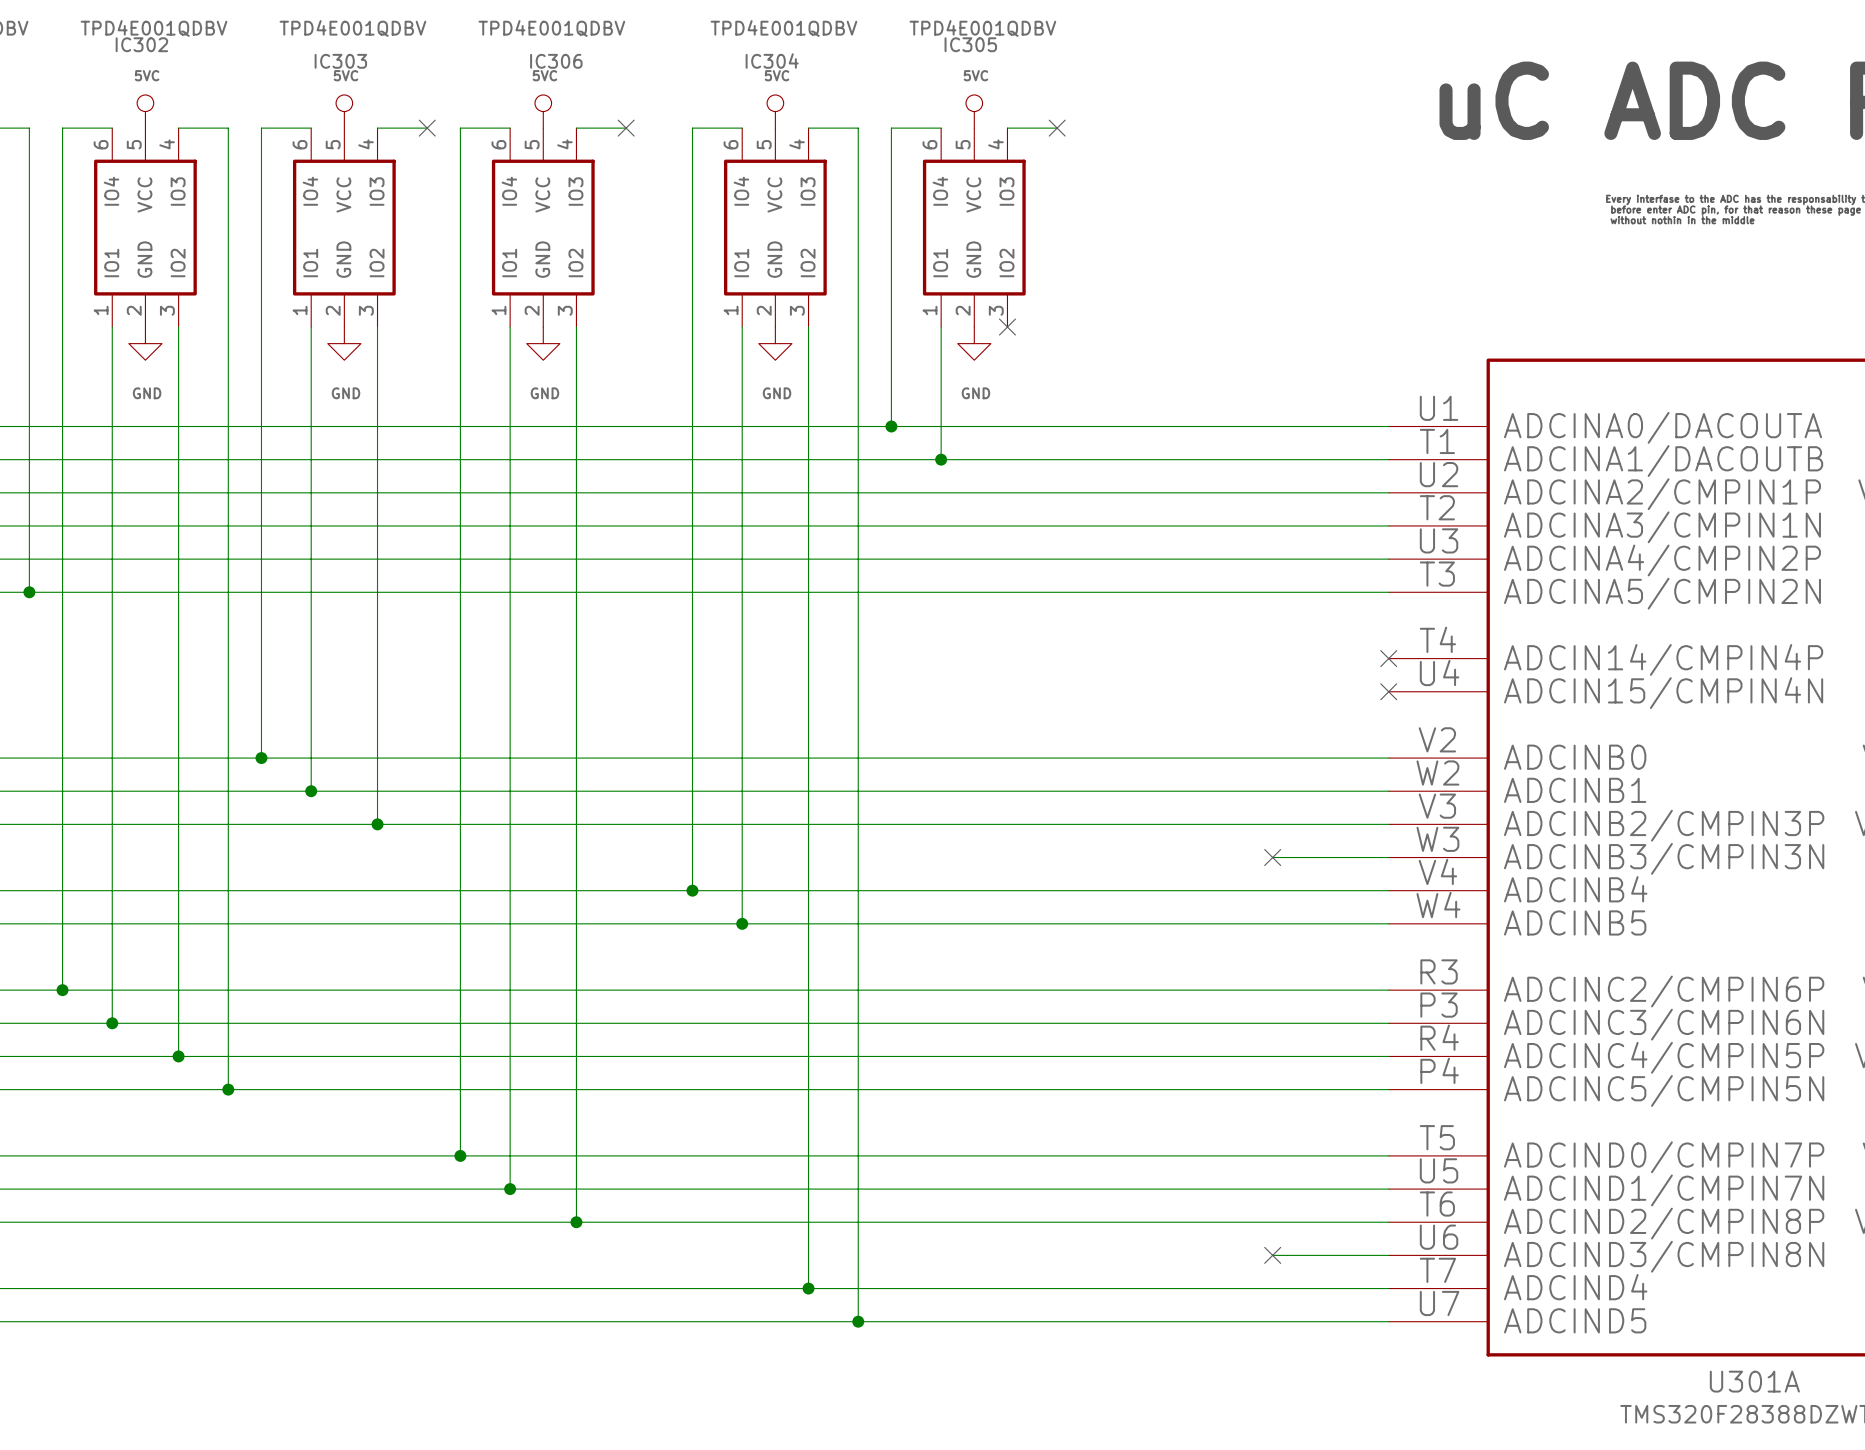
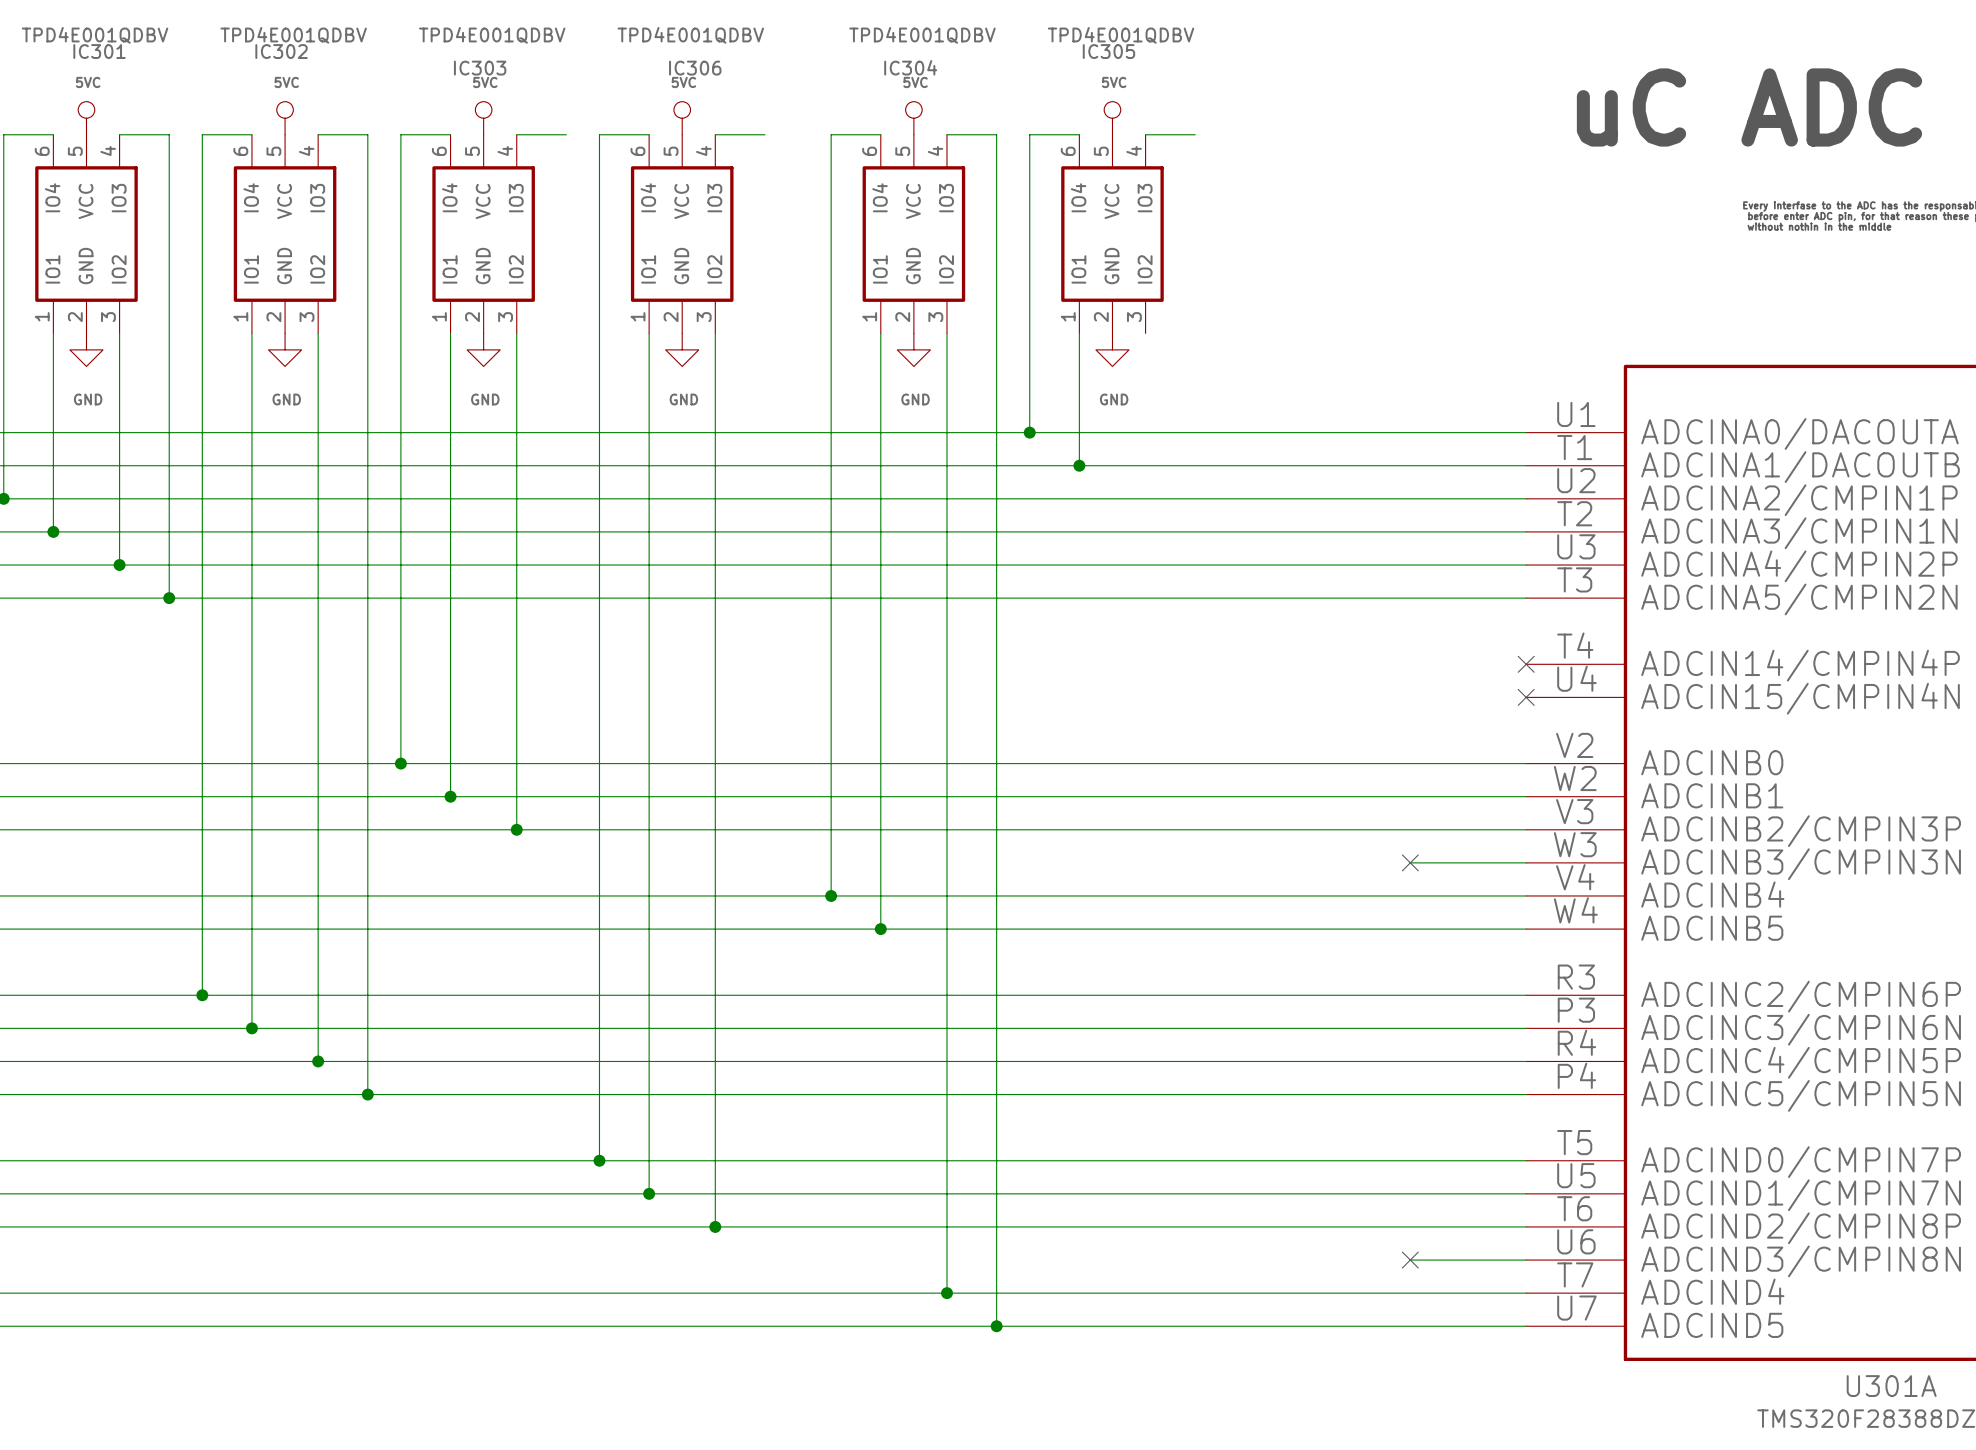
no-connect mark: (427, 128) -> none
no-connect mark: (626, 128) -> none
no-connect mark: (1057, 128) -> none
no-connect mark: (1007, 327) -> none

